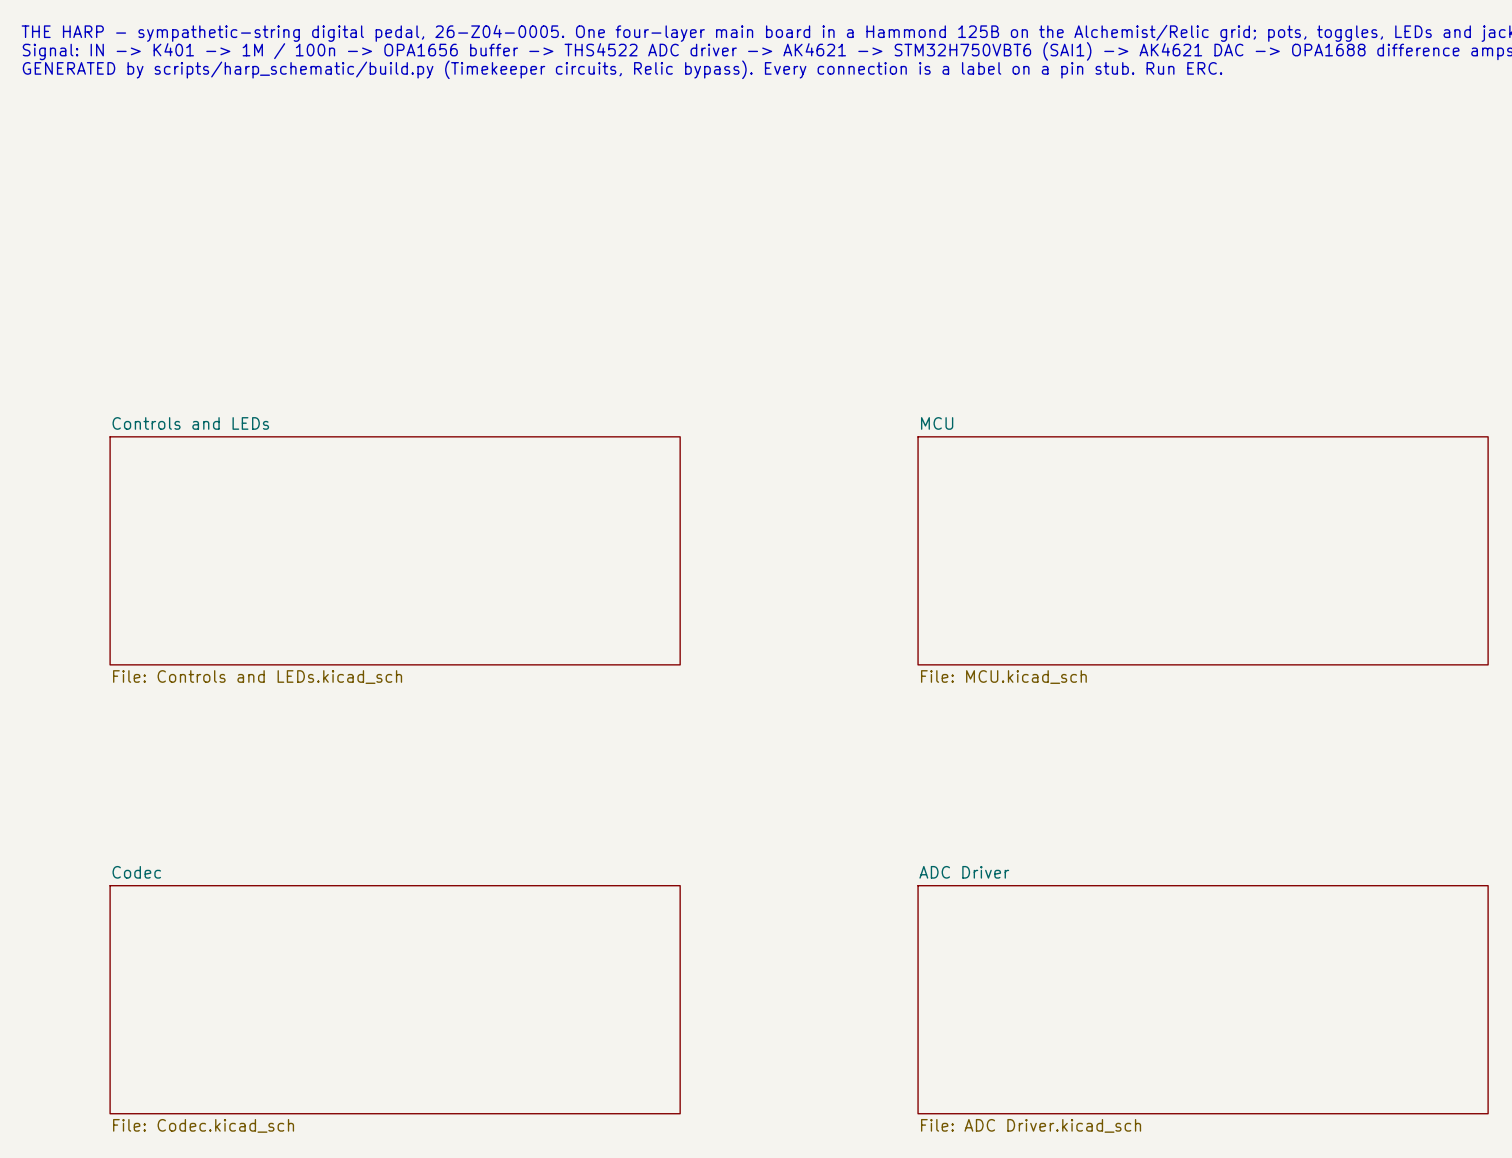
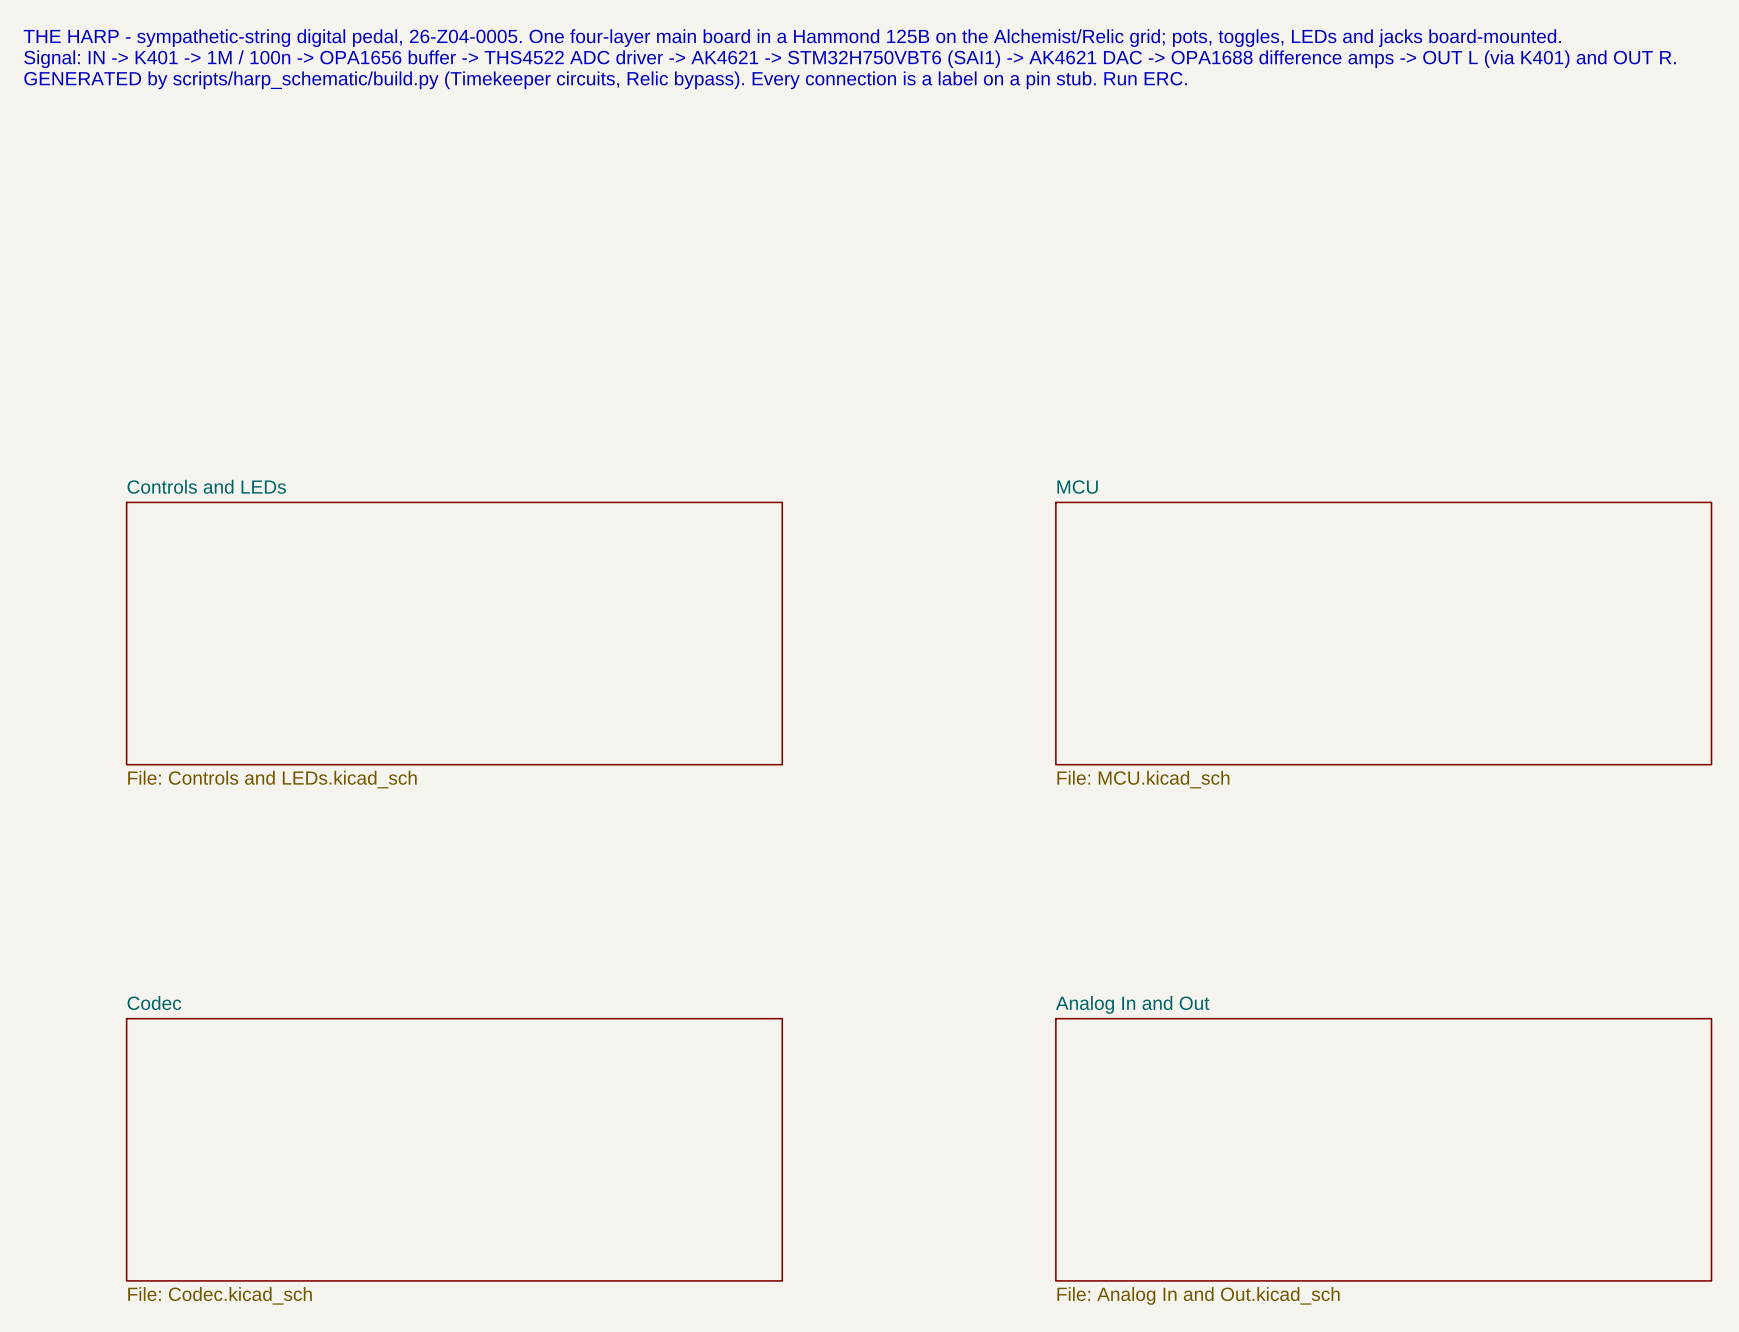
sheet ADC Driver name: ADC Driver (964, 872) -> Analog In and Out (1132, 1004)
sheet ADC Driver value: File: ADC Driver.kicad_sch (1031, 1125) -> File: Analog In and Out.kicad_sch (1198, 1295)

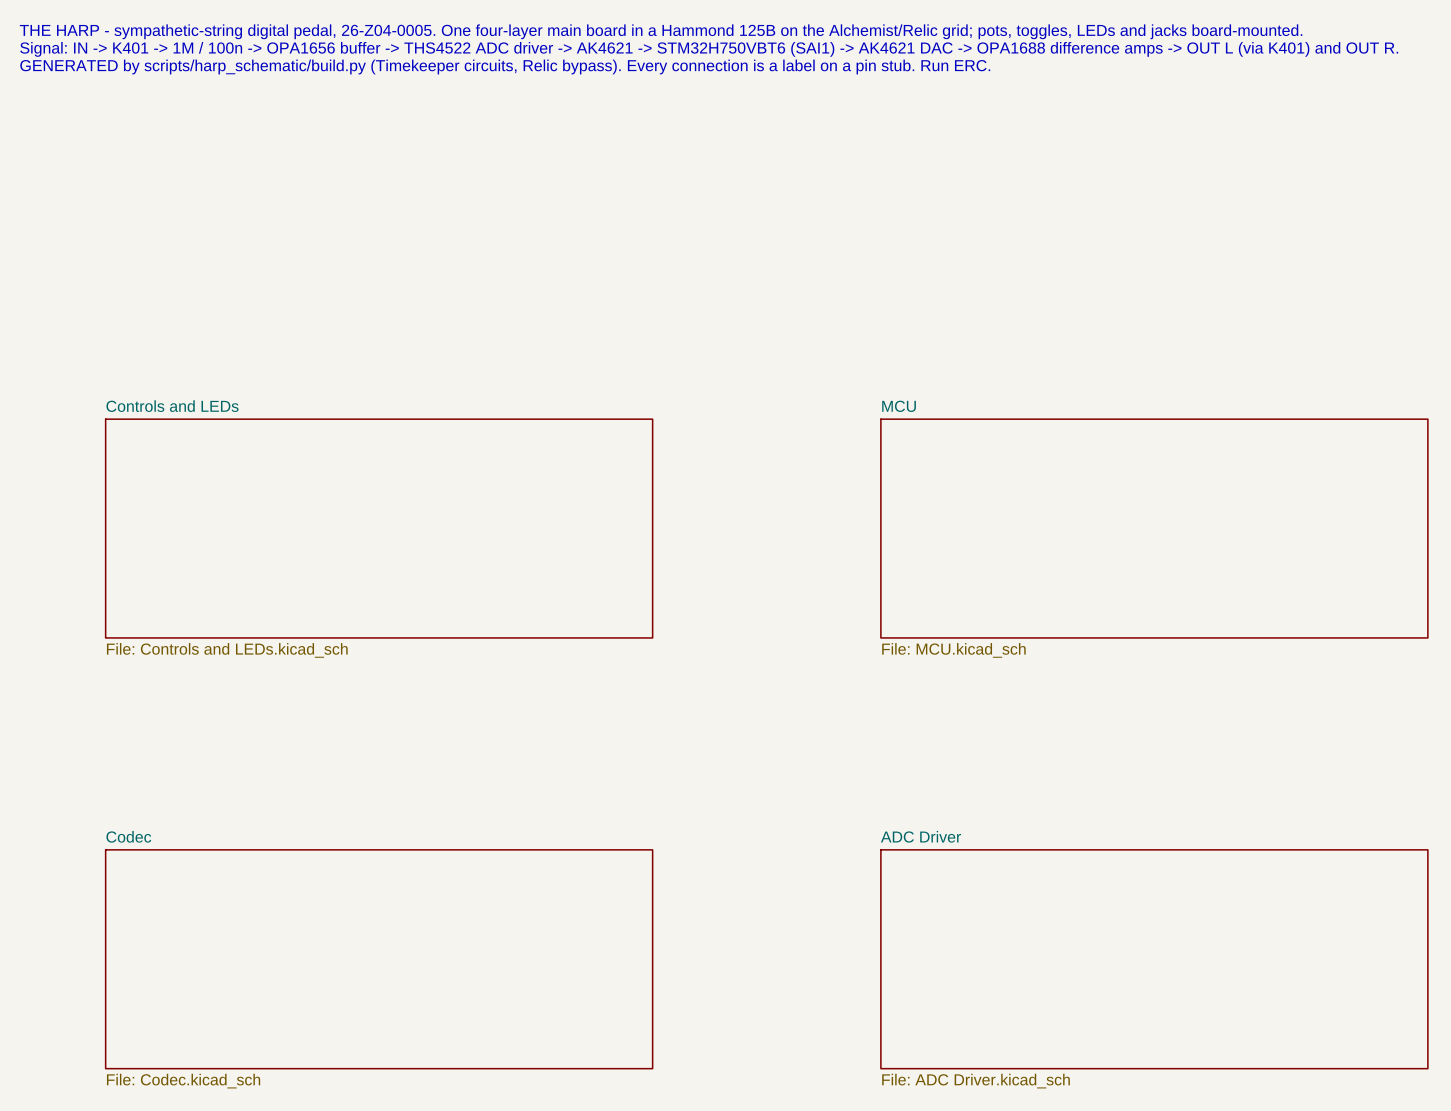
sheet Analog In and Out name: Analog In and Out (1132, 1004) -> ADC Driver (920, 836)
sheet Analog In and Out value: File: Analog In and Out.kicad_sch (1198, 1295) -> File: ADC Driver.kicad_sch (976, 1081)

